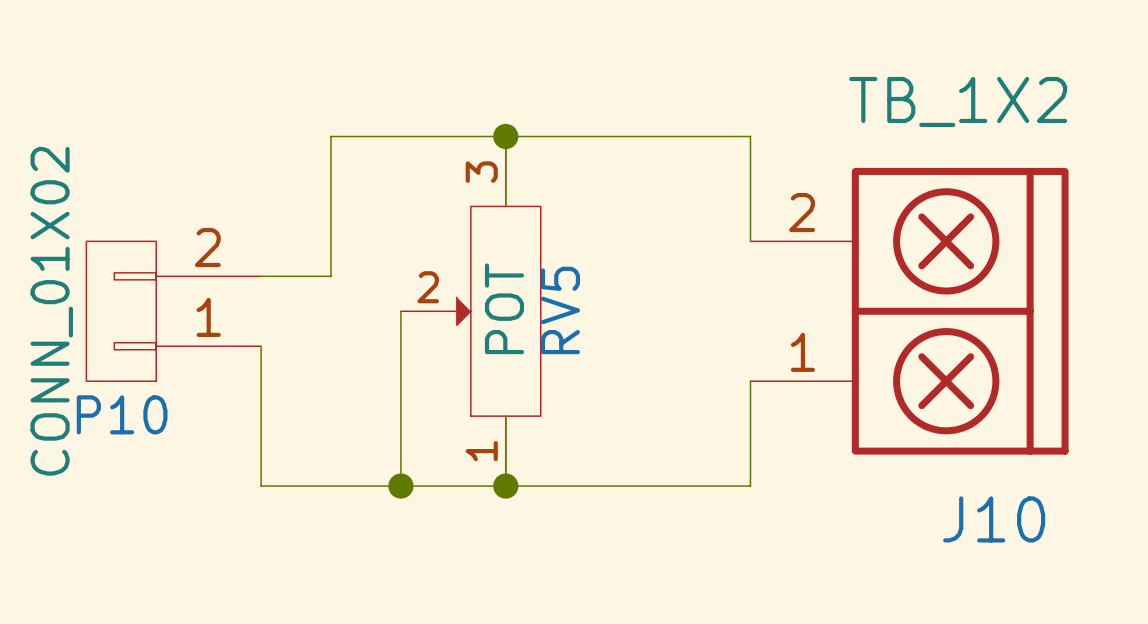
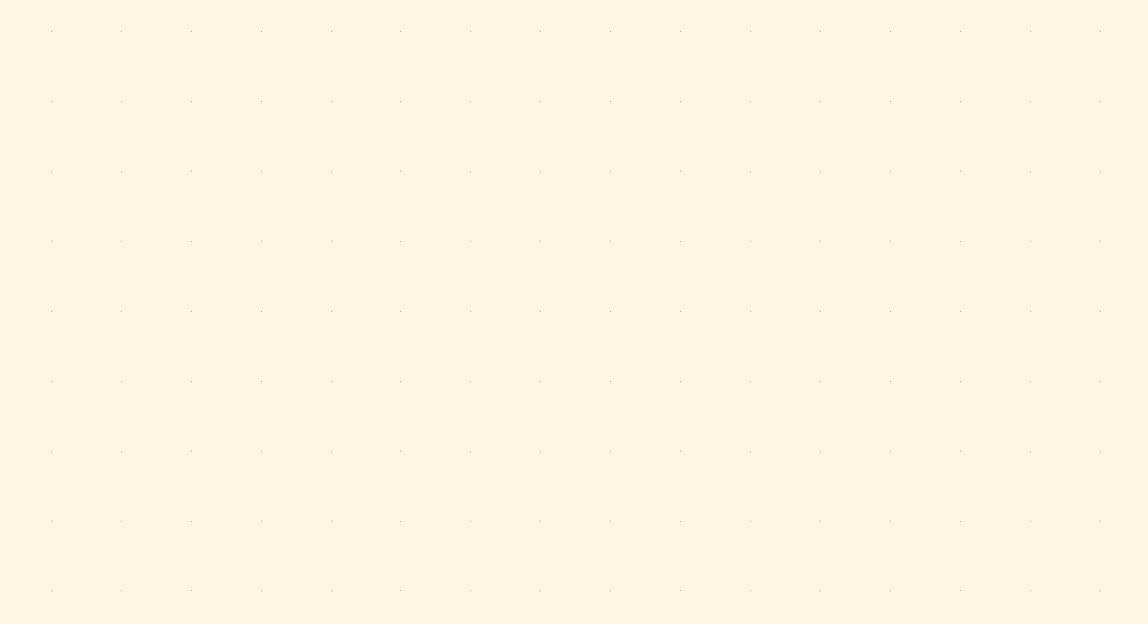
wire: (505, 136) (505, 206) -> none
junction: (505, 136) -> none
wire: (750, 241) (750, 136) (331, 136) (331, 276) (261, 276) -> none
P10: CONN_01X02 (173, 311) -> none
wire: (400, 311) (400, 486) -> none
RV5: POT (470, 311) -> none
J10: TB_1X2 (909, 311) -> none
wire: (261, 346) (261, 486) (750, 486) (750, 381) -> none
wire: (505, 416) (505, 486) -> none
junction: (400, 486) -> none
junction: (505, 486) -> none

